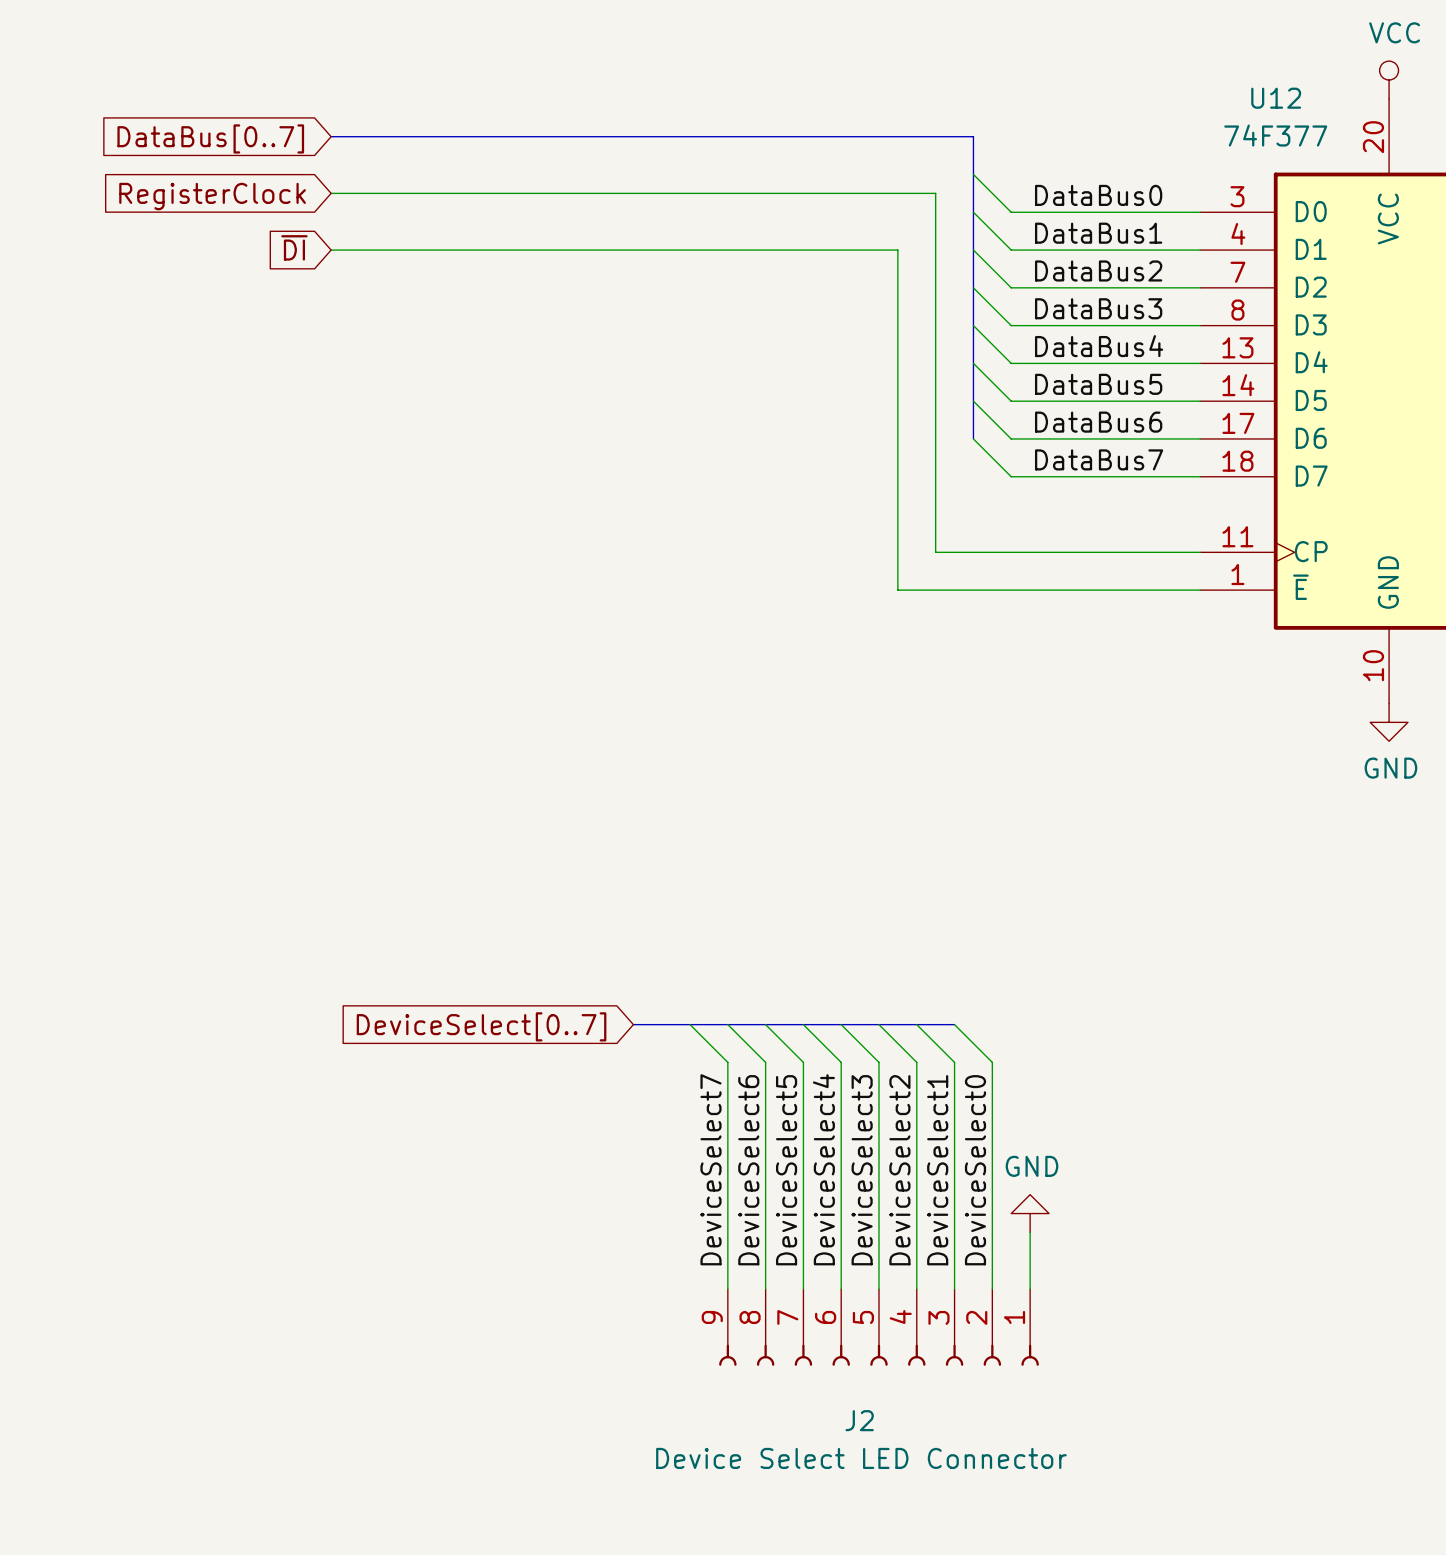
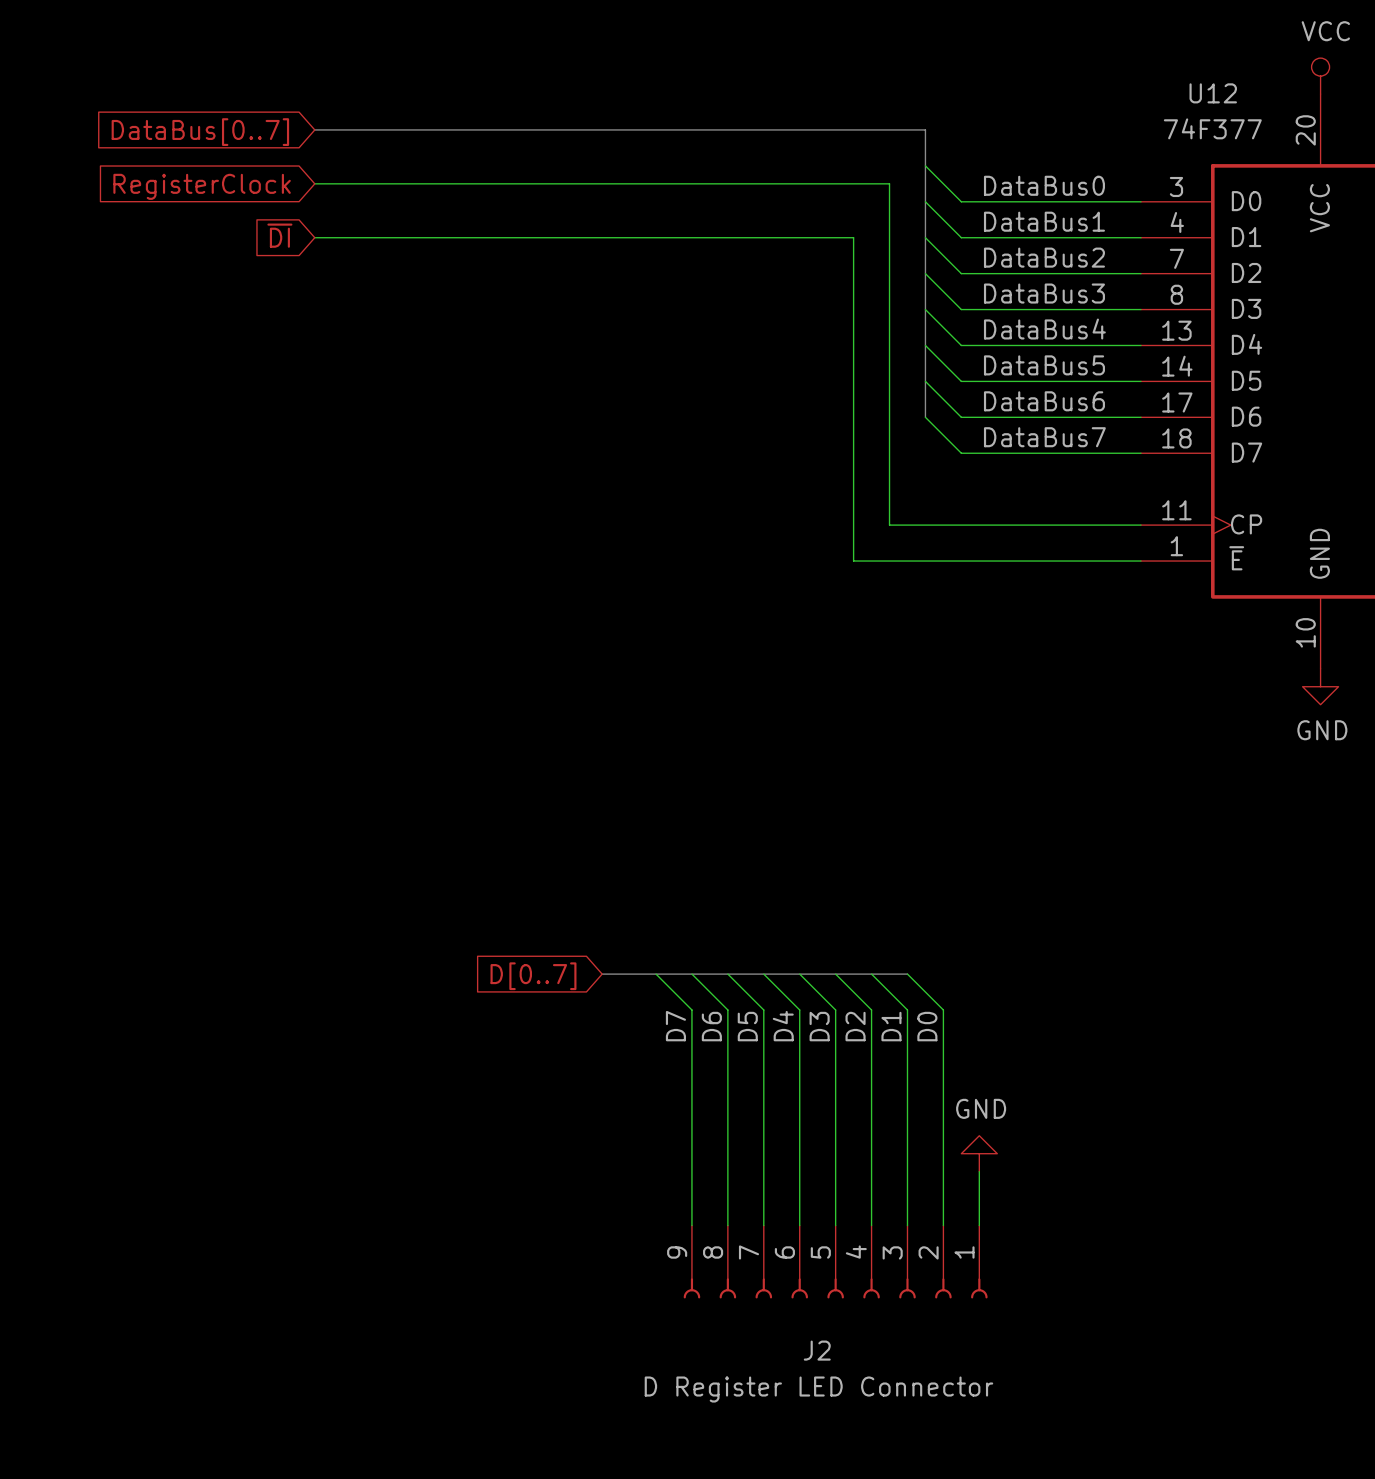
global label: DeviceSelect[0..7] (481, 1026) -> D[0..7] (533, 976)
label: none -> D7 (675, 1026)
label: none -> D6 (711, 1026)
label: none -> D5 (747, 1026)
label: none -> D4 (783, 1026)
label: none -> D3 (819, 1026)
label: none -> D2 (855, 1026)
label: none -> D1 (891, 1026)
label: none -> D0 (927, 1026)
label: DeviceSelect7 (710, 1169) -> none
label: DeviceSelect4 (823, 1169) -> none
label: DeviceSelect6 (748, 1170) -> none
label: DeviceSelect5 (786, 1170) -> none
label: DeviceSelect3 (862, 1170) -> none
label: DeviceSelect2 (899, 1170) -> none
label: DeviceSelect1 (937, 1170) -> none
label: DeviceSelect0 (975, 1170) -> none
J2 value: Device Select LED Connector (861, 1458) -> D Register LED Connector (818, 1389)

